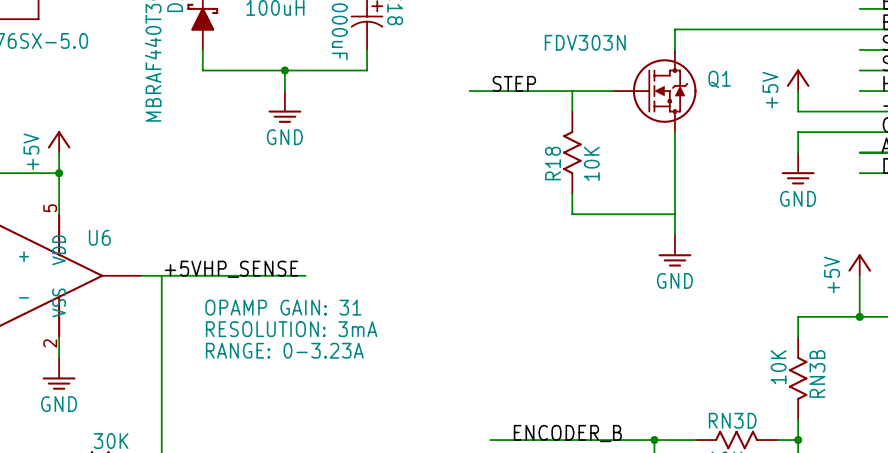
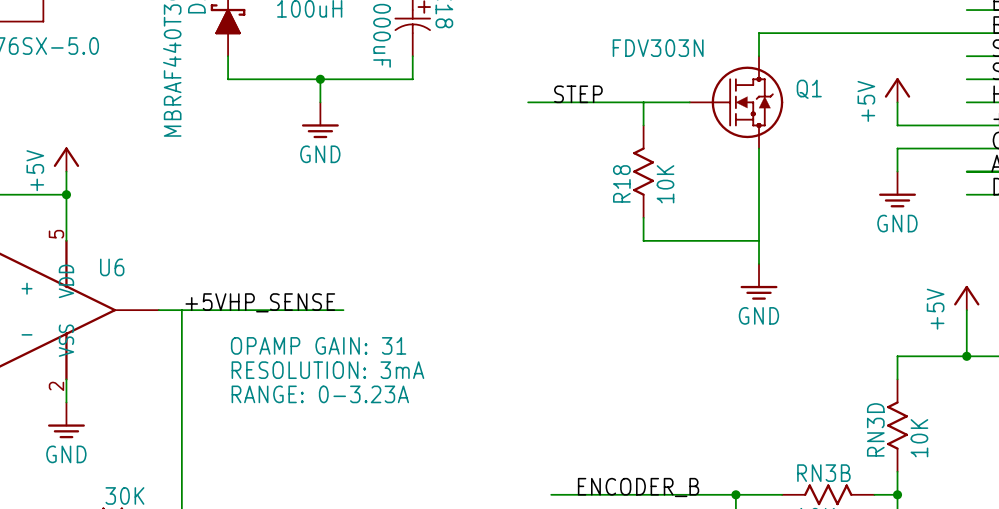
RN3B: 10K (798, 378) -> none
RN3D: none -> 10K (897, 425)
RN3D name: RN3D (732, 420) -> RN3B (823, 473)

